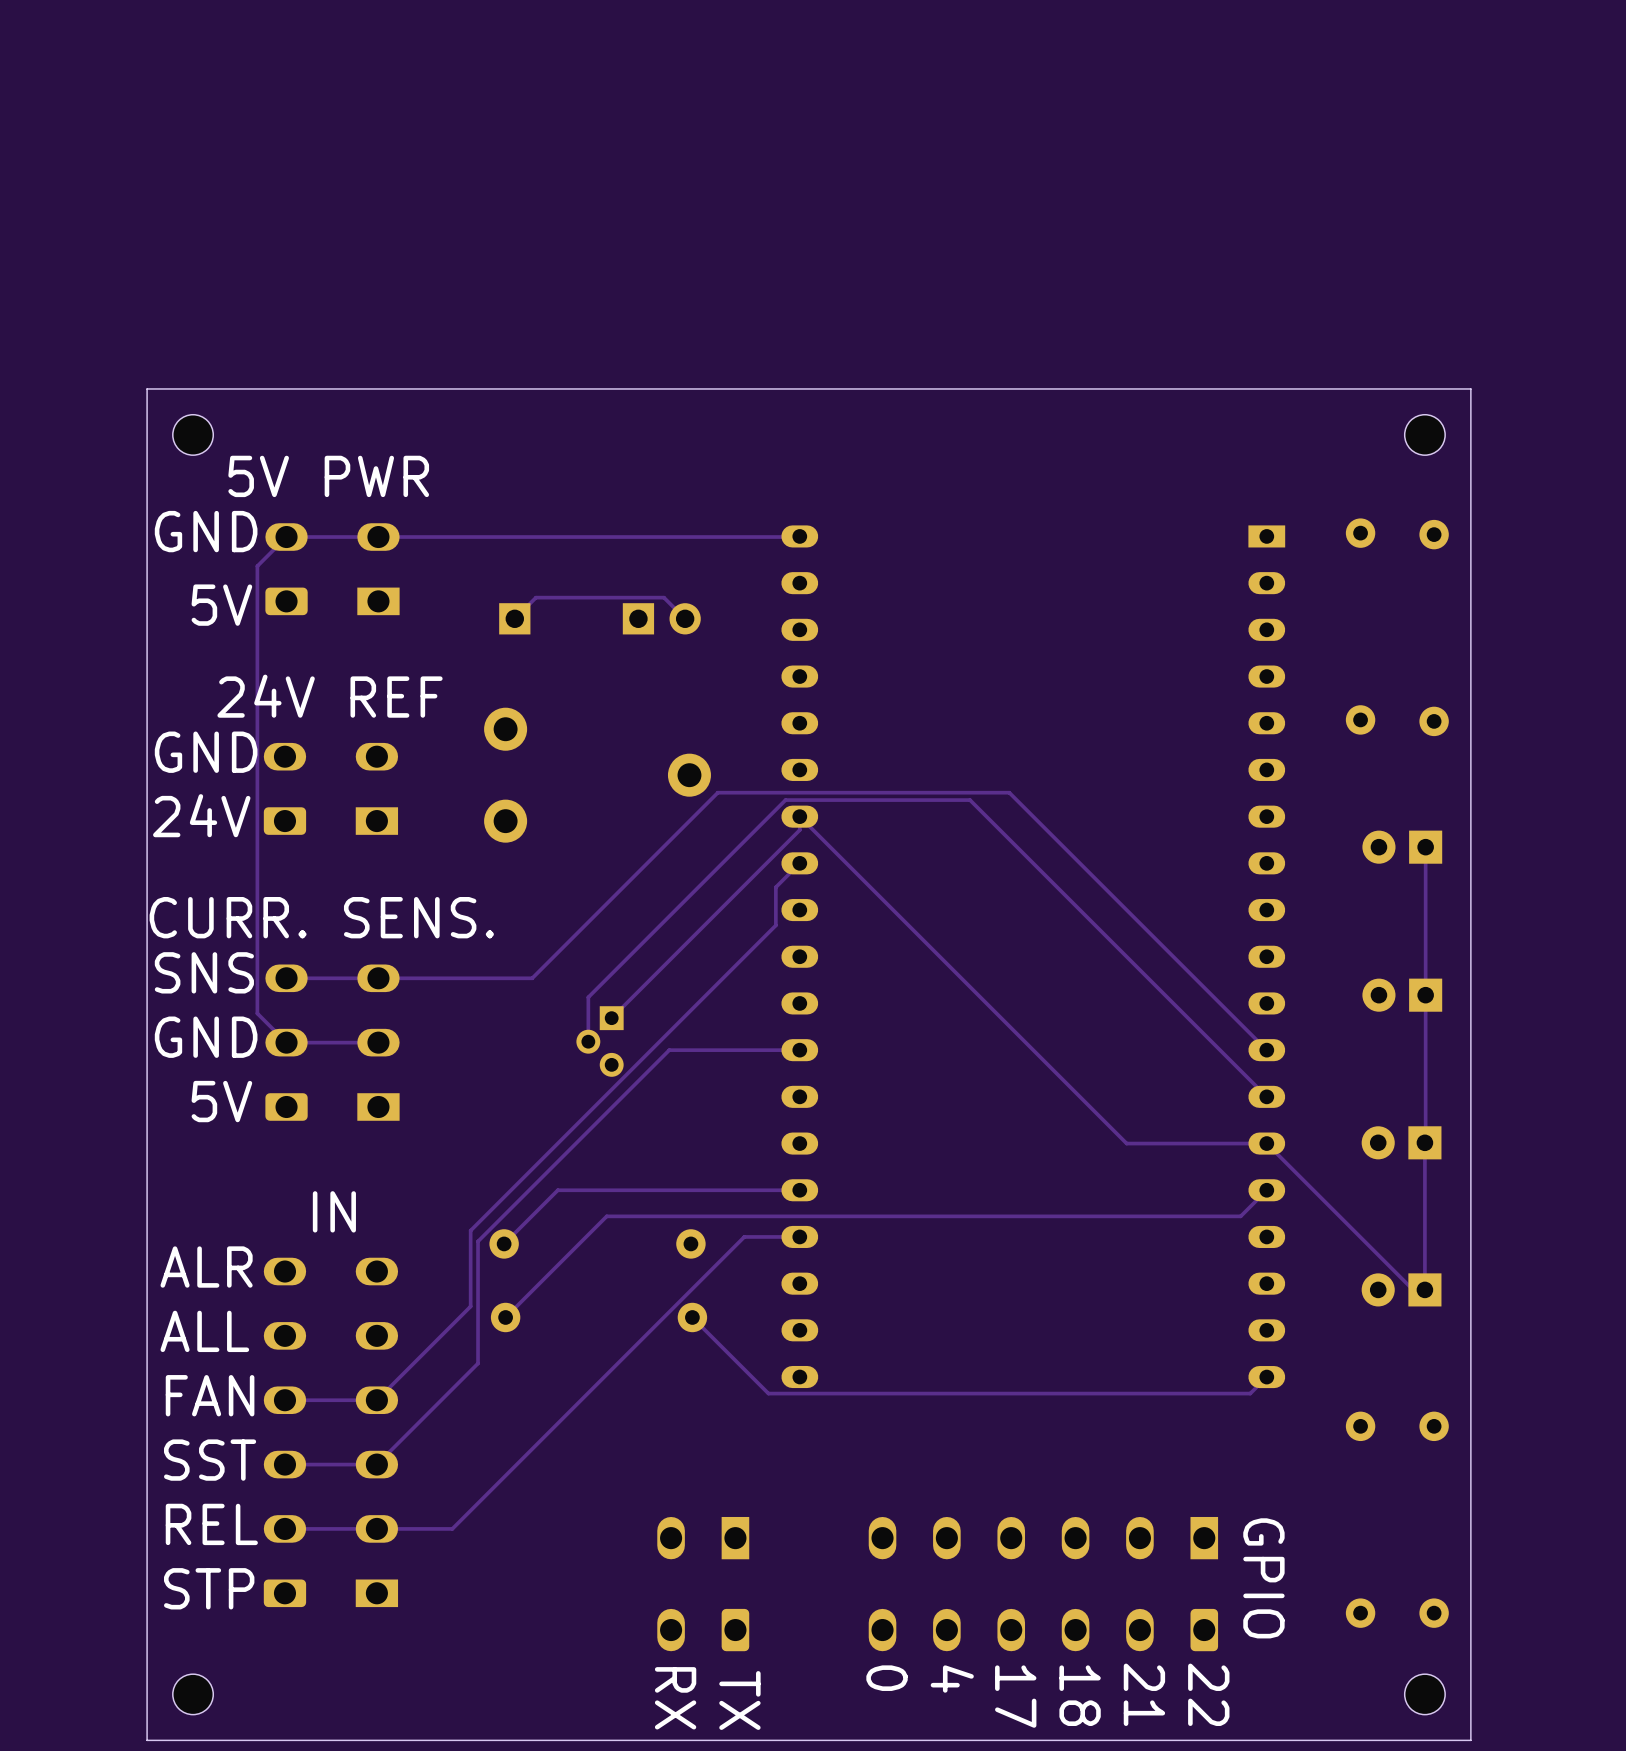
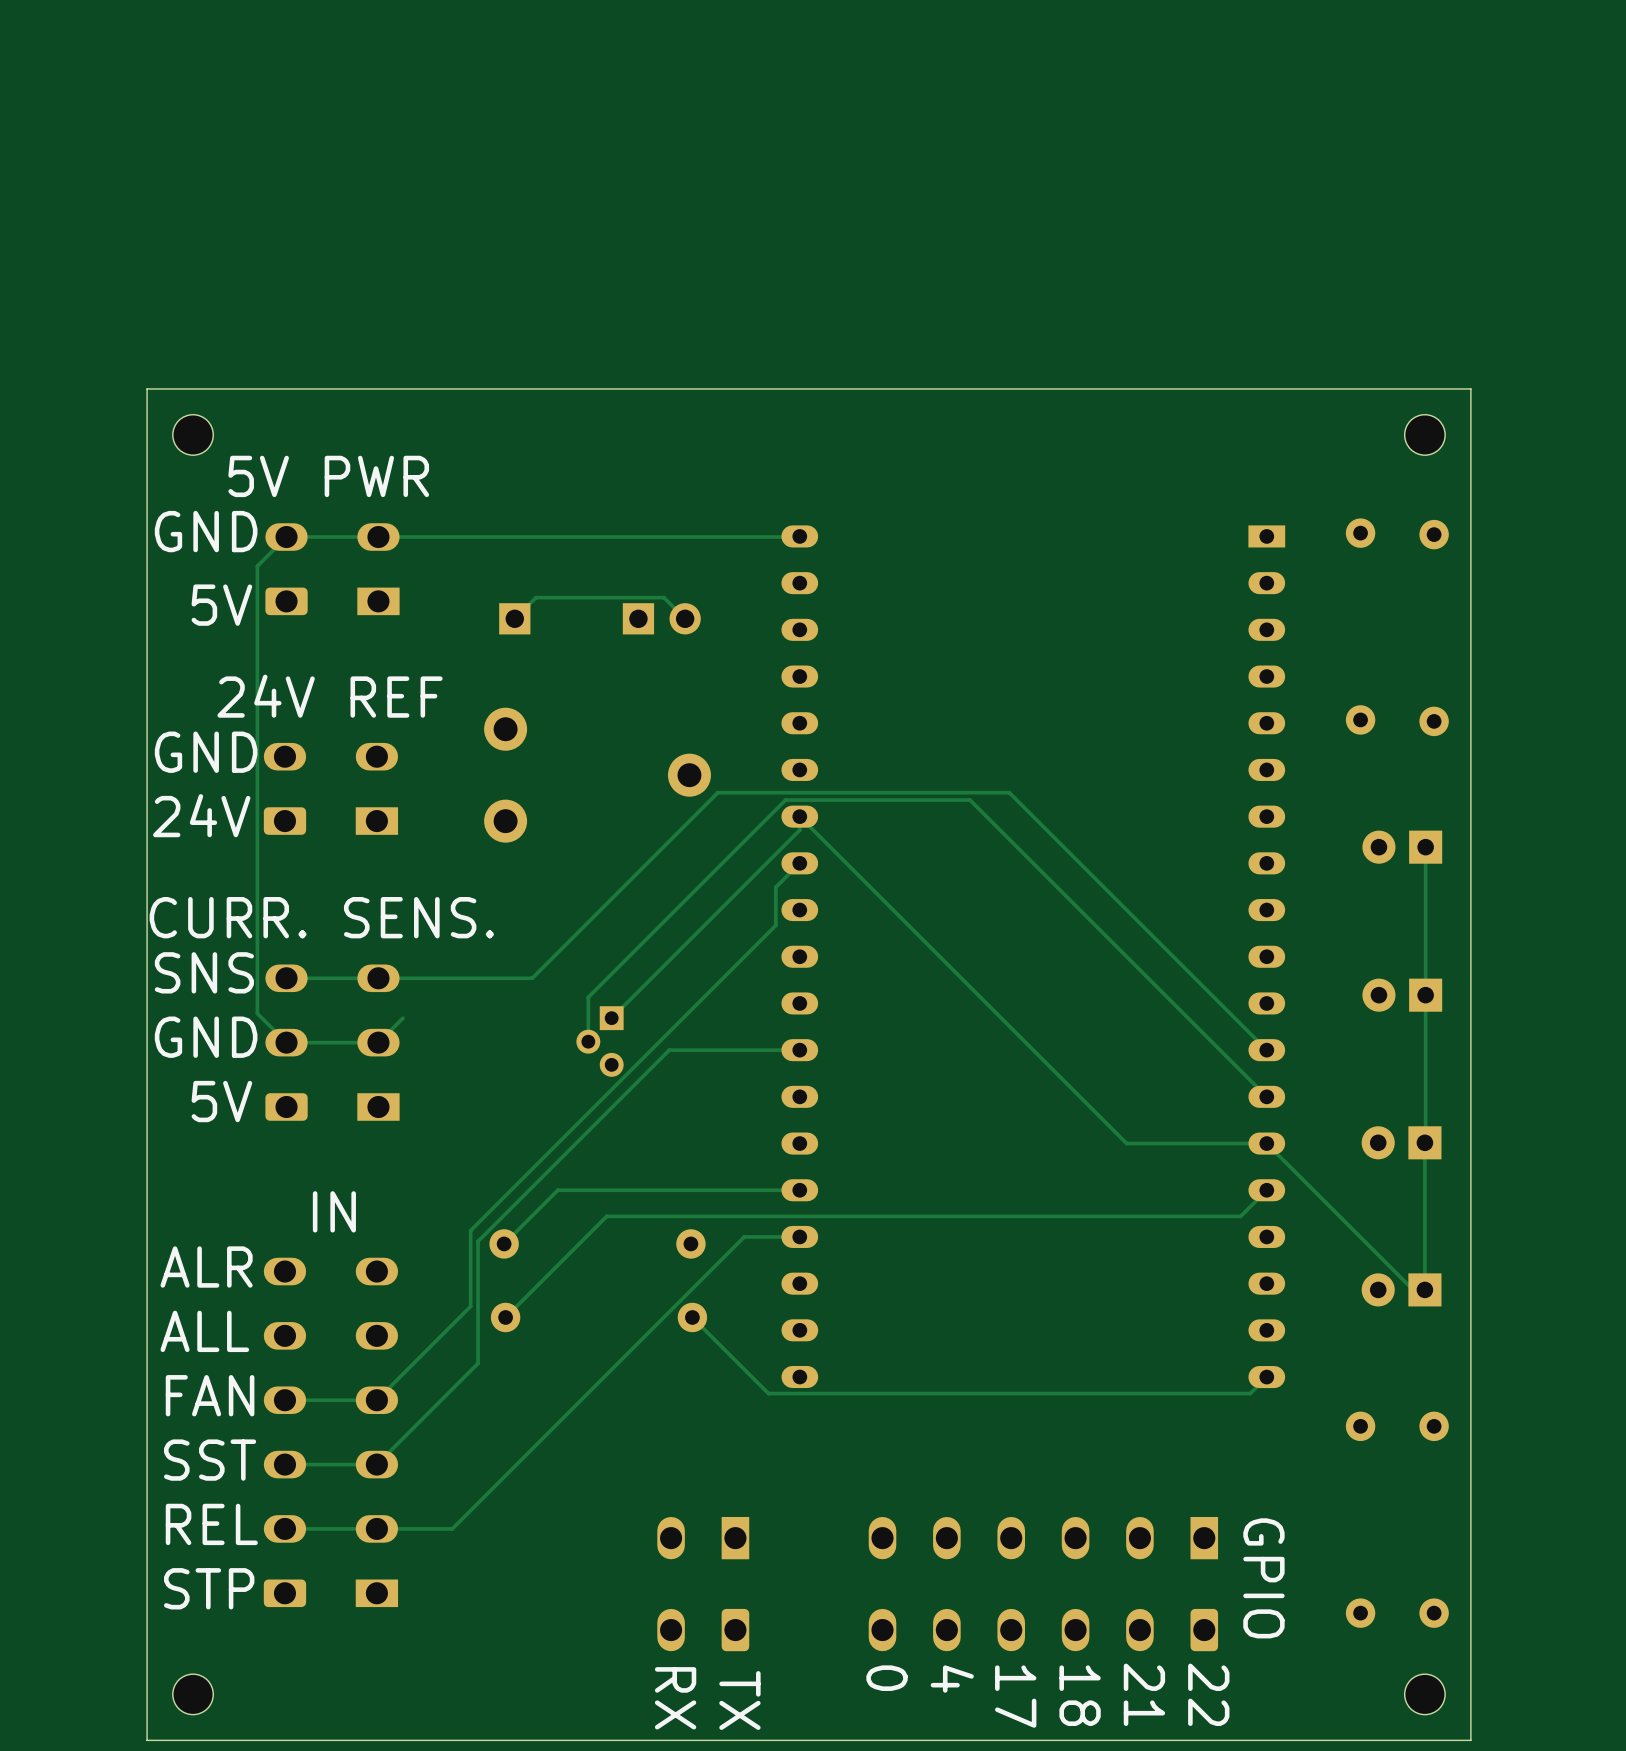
track: none -> (402, 1018) (378, 1042)

